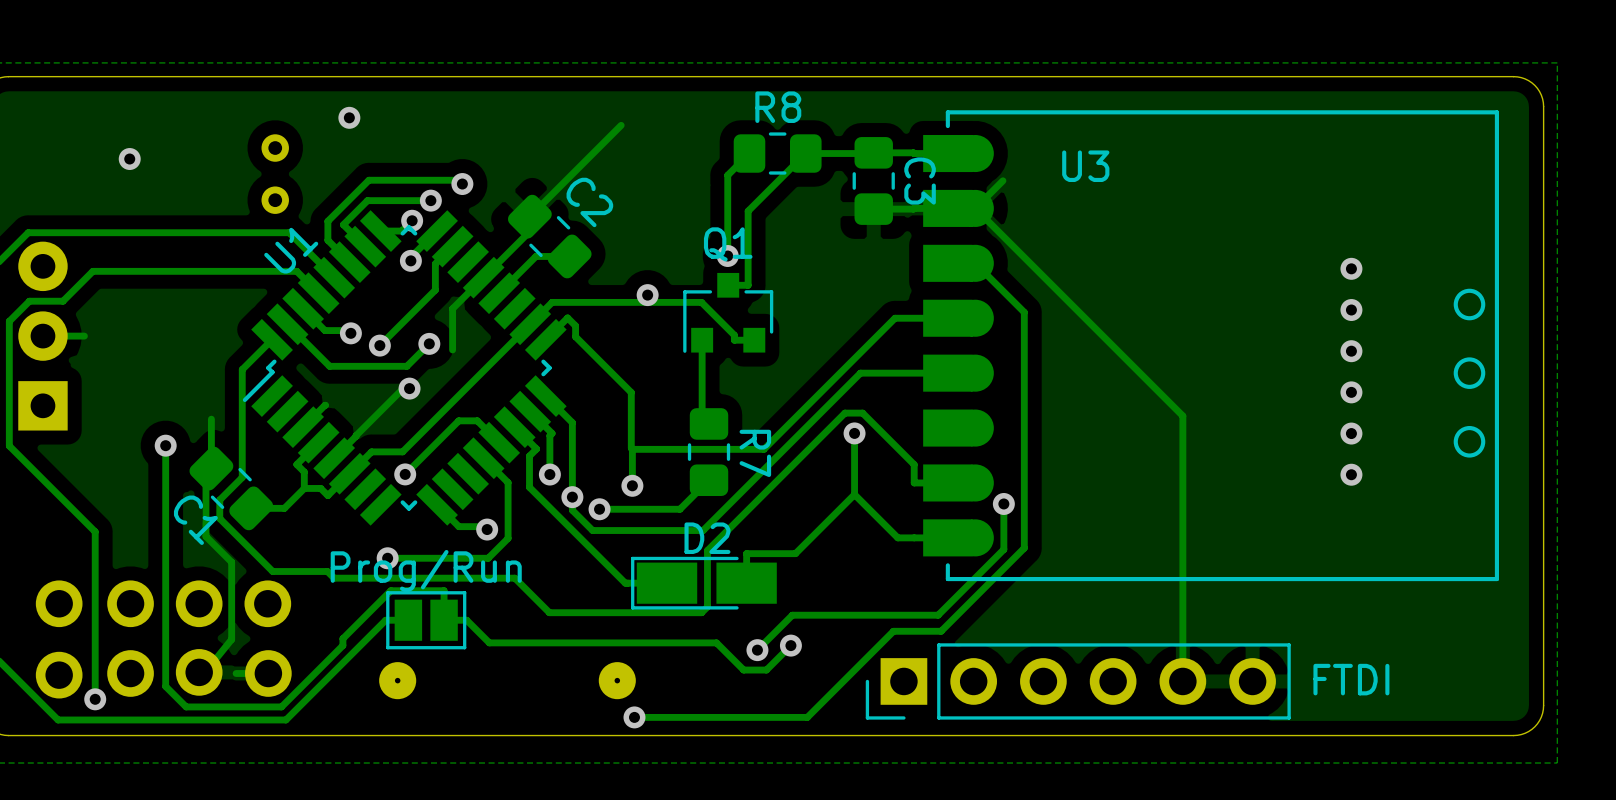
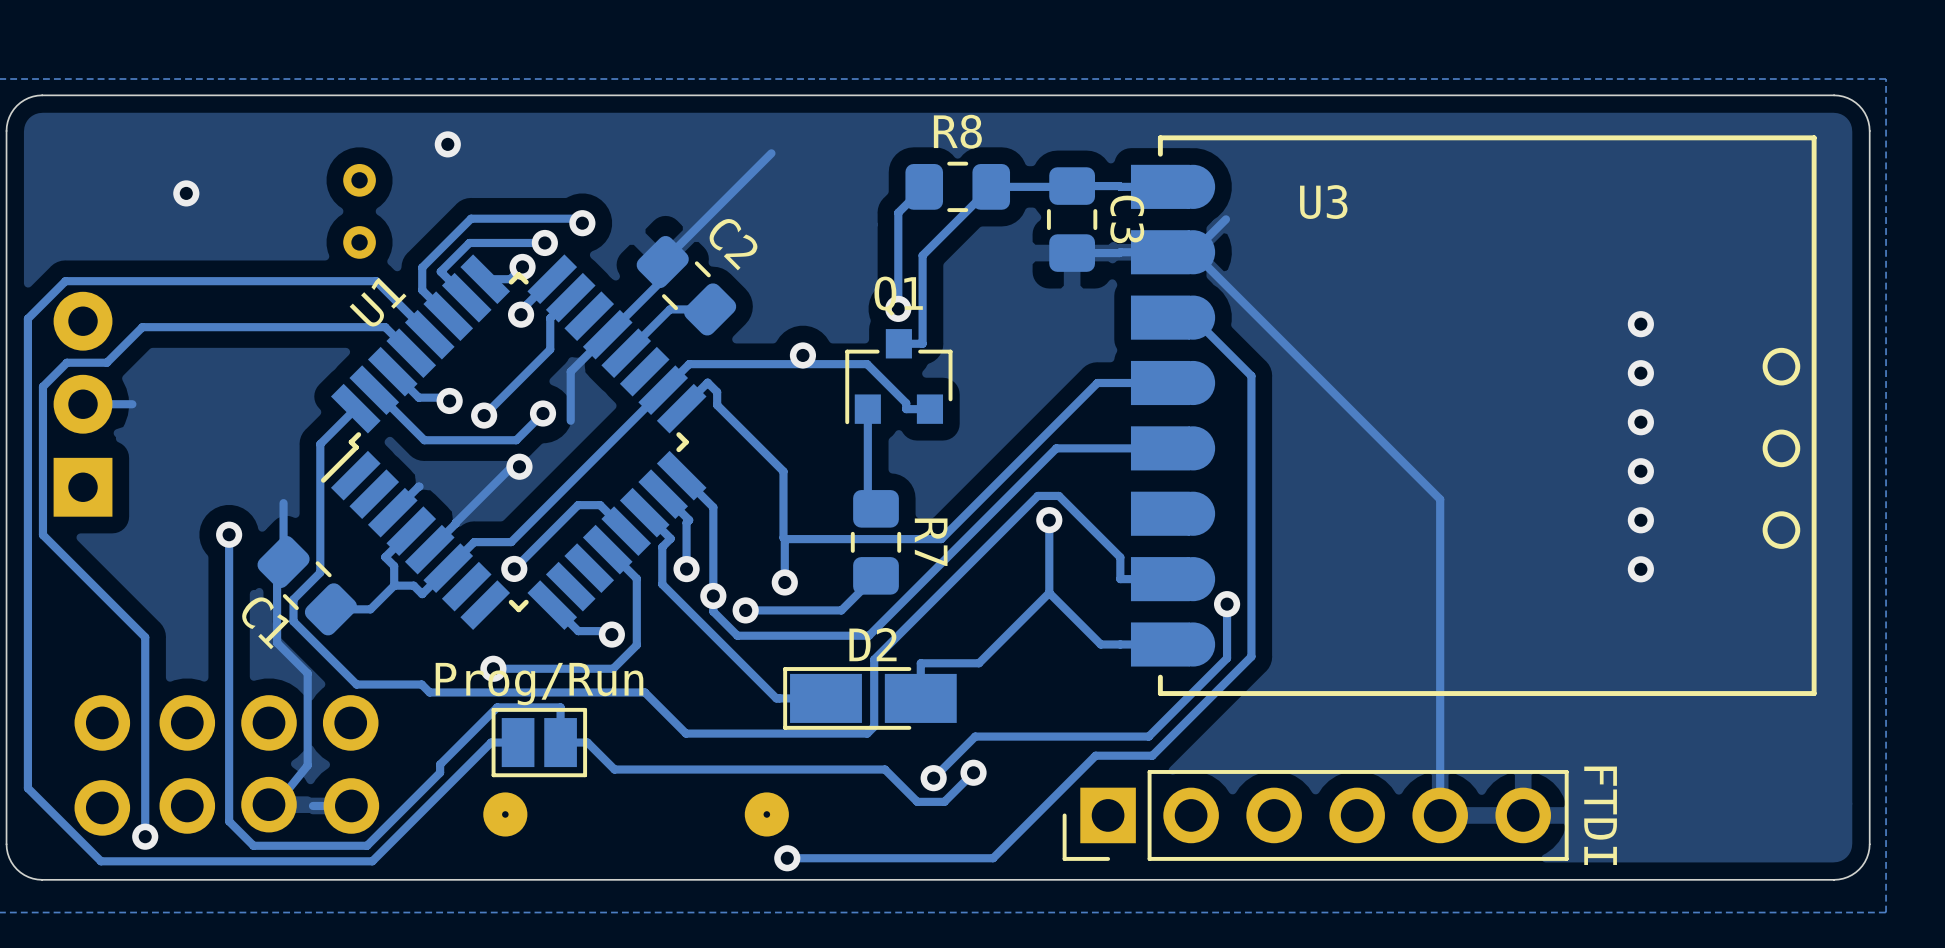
part value rotation: 0° (1351, 679) -> 90° clockwise (1600, 815)

